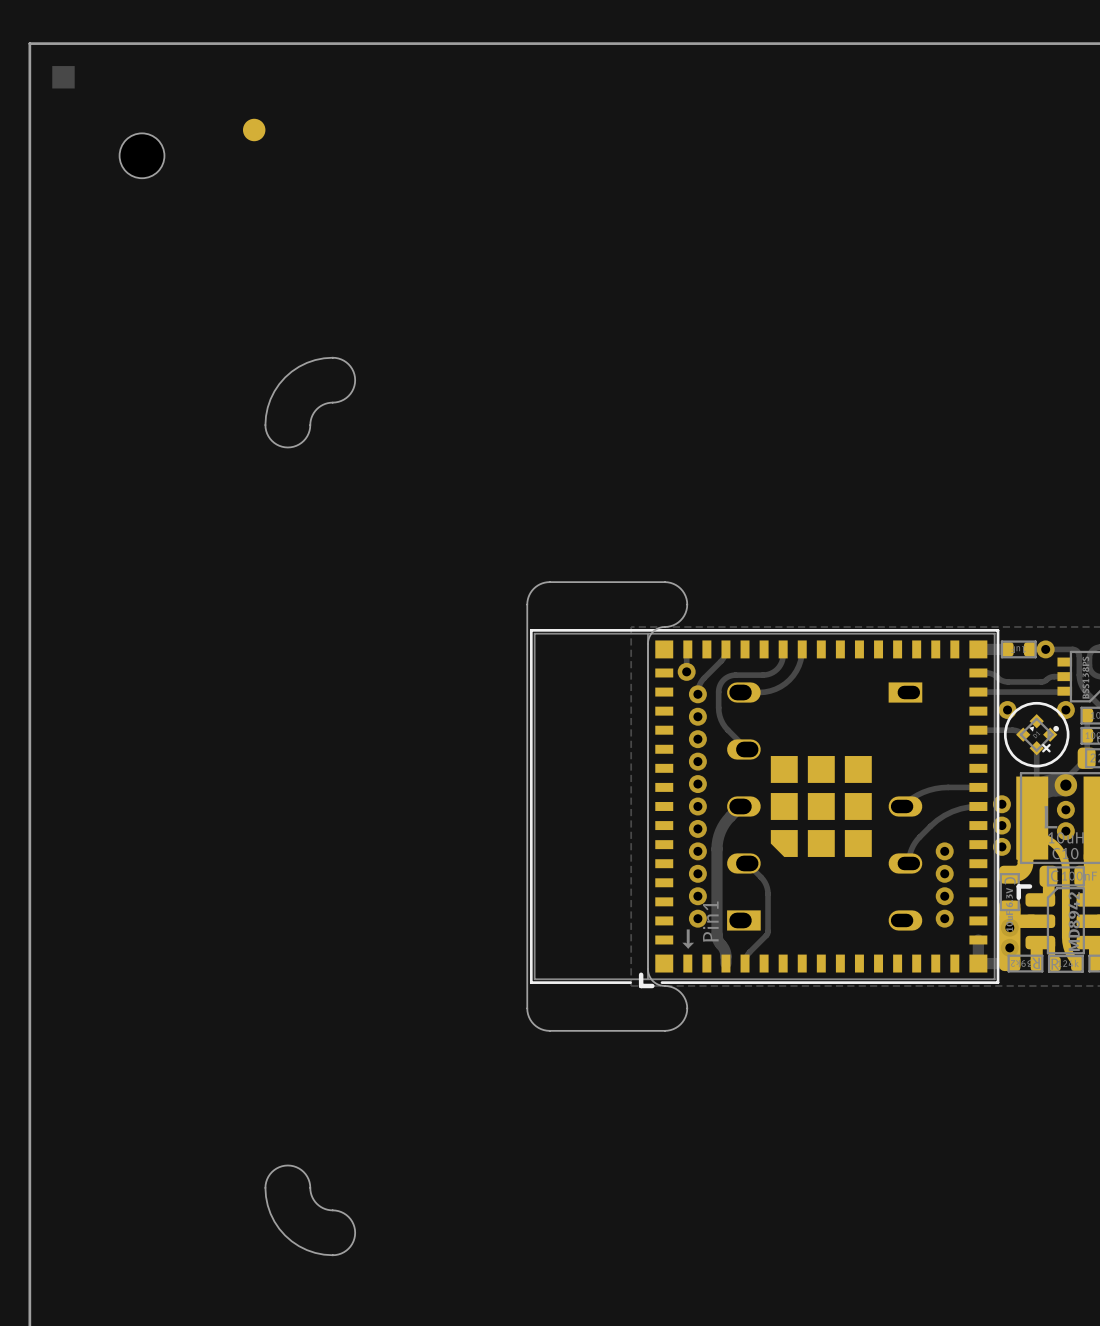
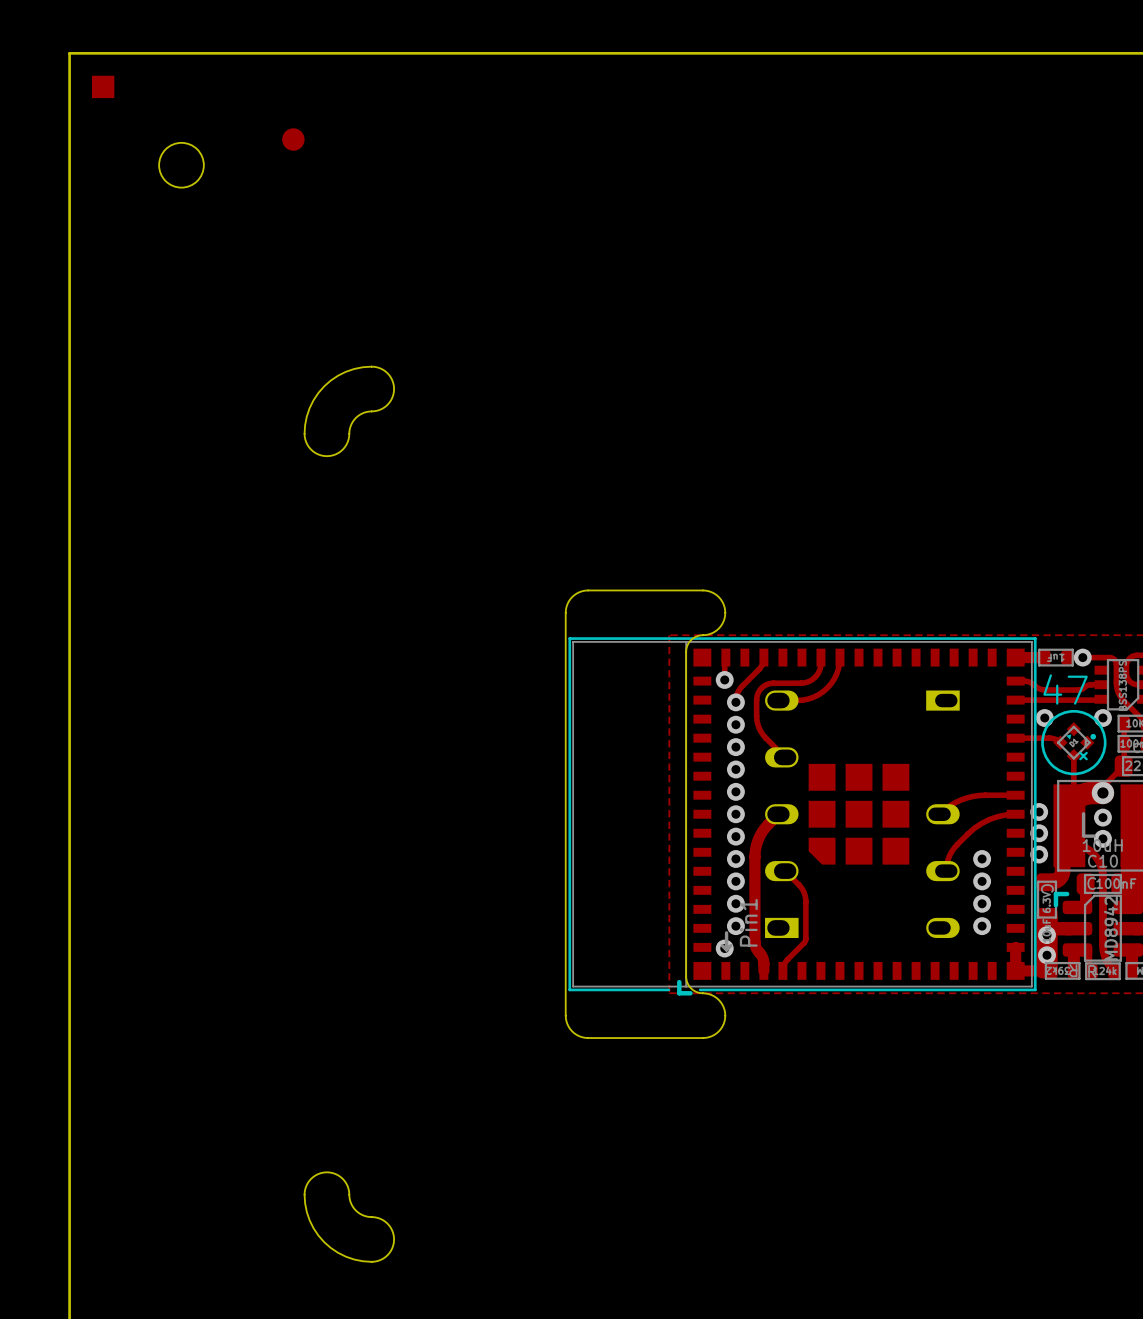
text: none -> 47 (1065, 689)
via: none -> (724, 948)

